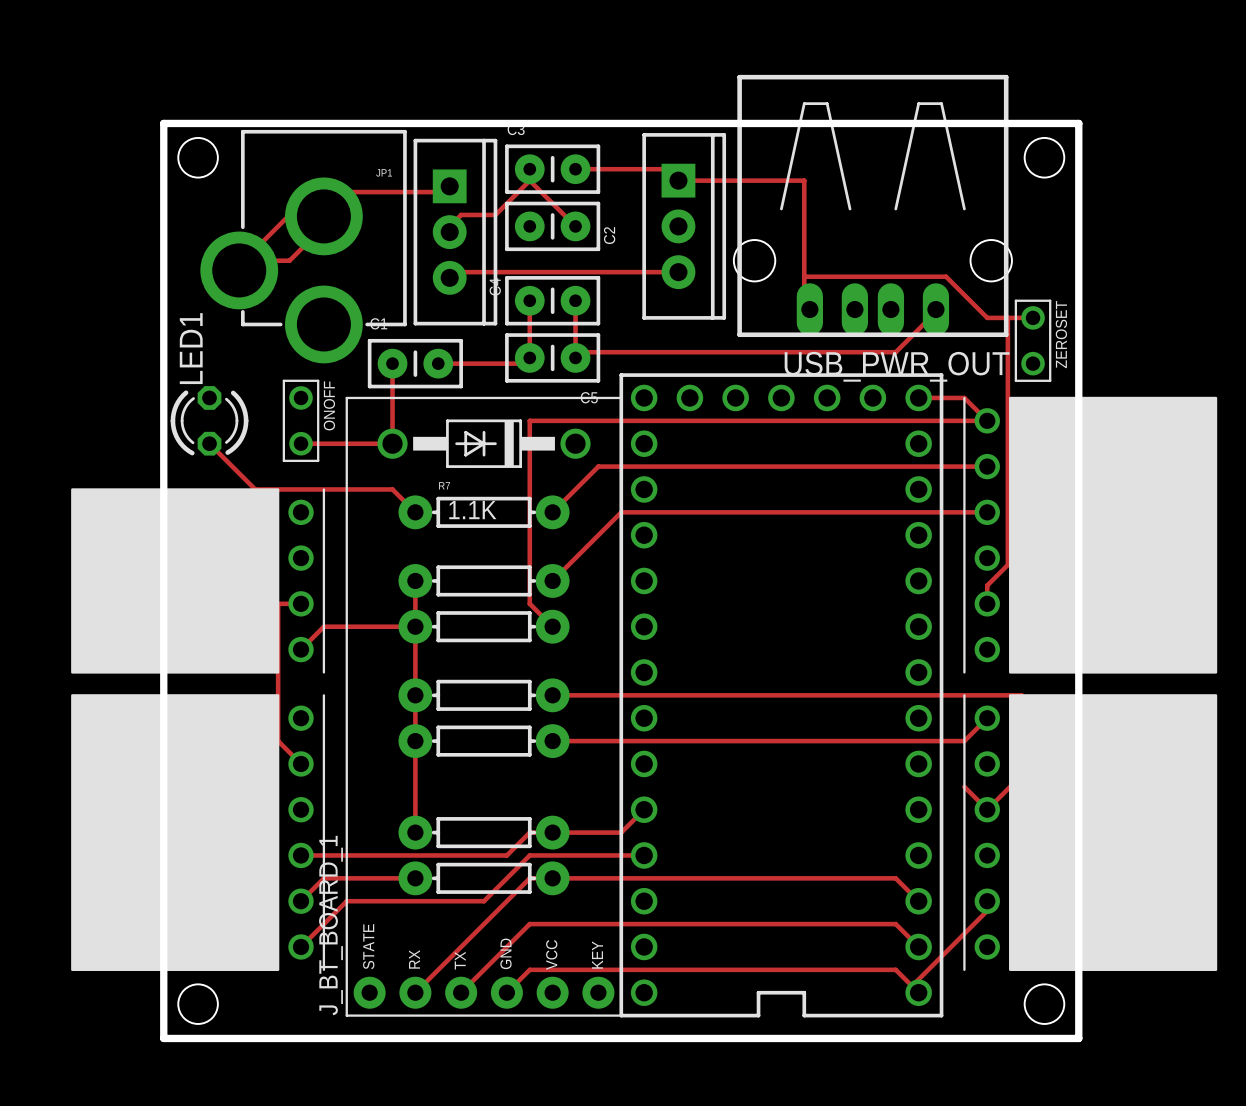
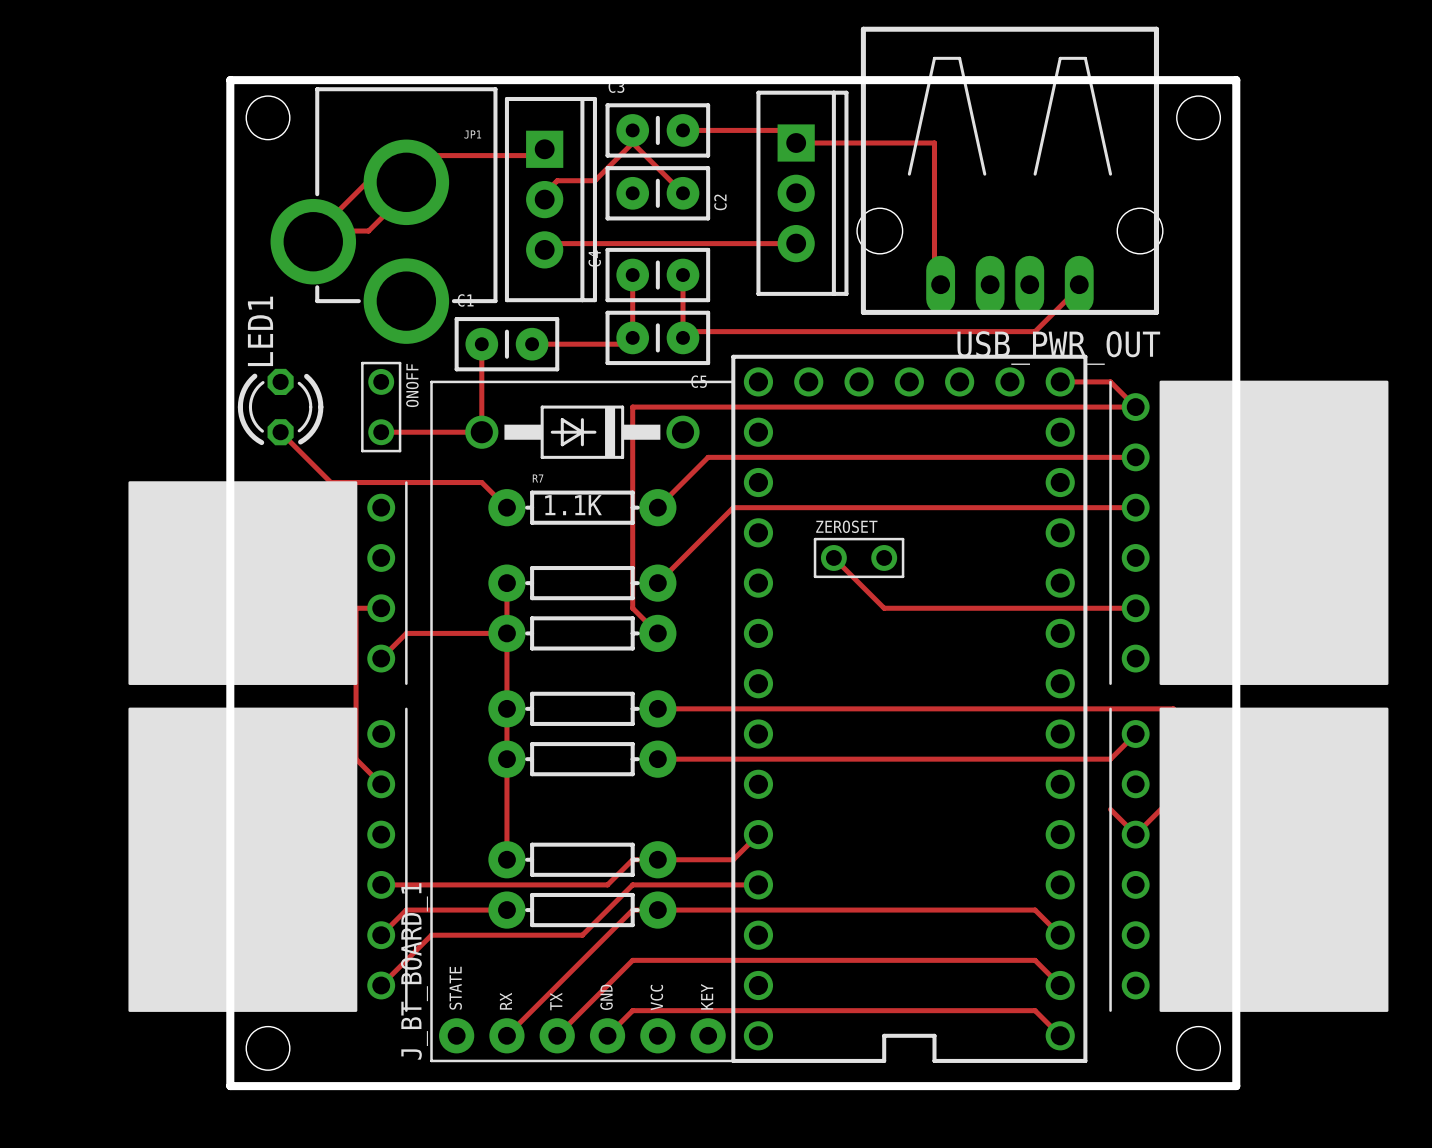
track: (804, 276) (946, 276) (987, 317) (1033, 317) -> none
track: (1007, 317) (1007, 564) (987, 585) (987, 603) -> (833, 557) (884, 608) (1135, 608)
ZEROSET name position: ZEROSET (1061, 334) -> ZEROSET (846, 526)
ZEROSET rotation: 0° (1033, 340) -> 90° clockwise (859, 557)
ZEROSET position: (1033, 340) -> (859, 557)
track: (987, 901) (987, 910) (913, 984) (918, 992) -> none

